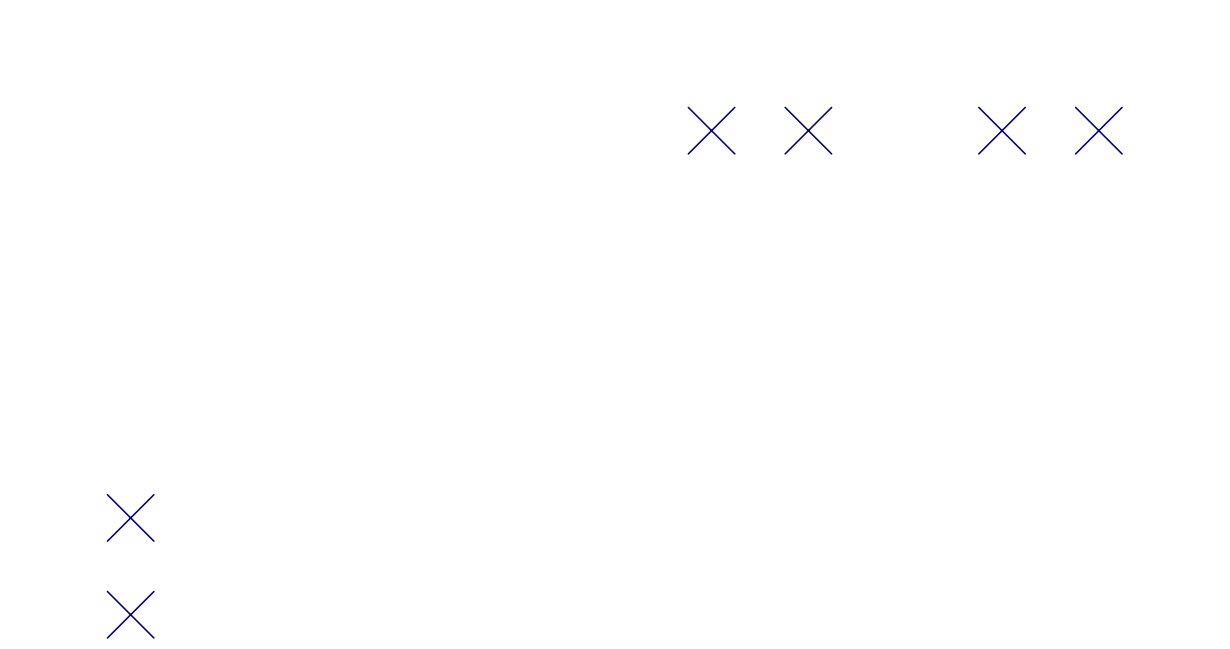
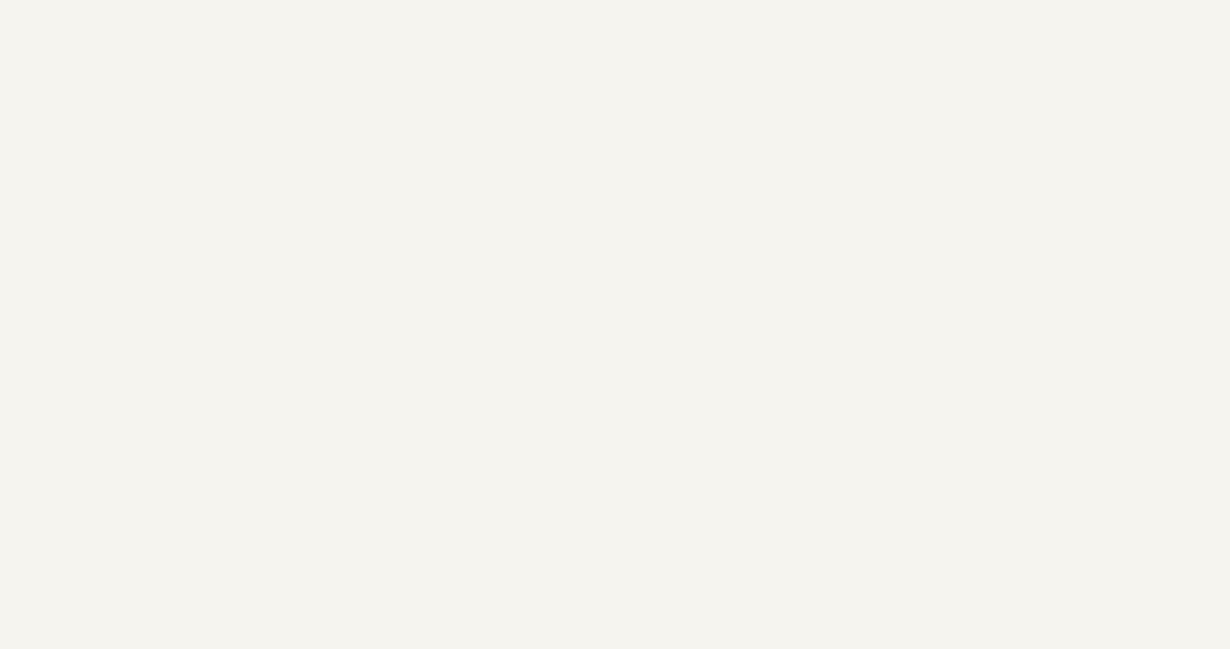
no-connect mark: (711, 130) -> none
no-connect mark: (808, 130) -> none
no-connect mark: (1002, 130) -> none
no-connect mark: (1098, 130) -> none
no-connect mark: (130, 517) -> none
no-connect mark: (130, 614) -> none

